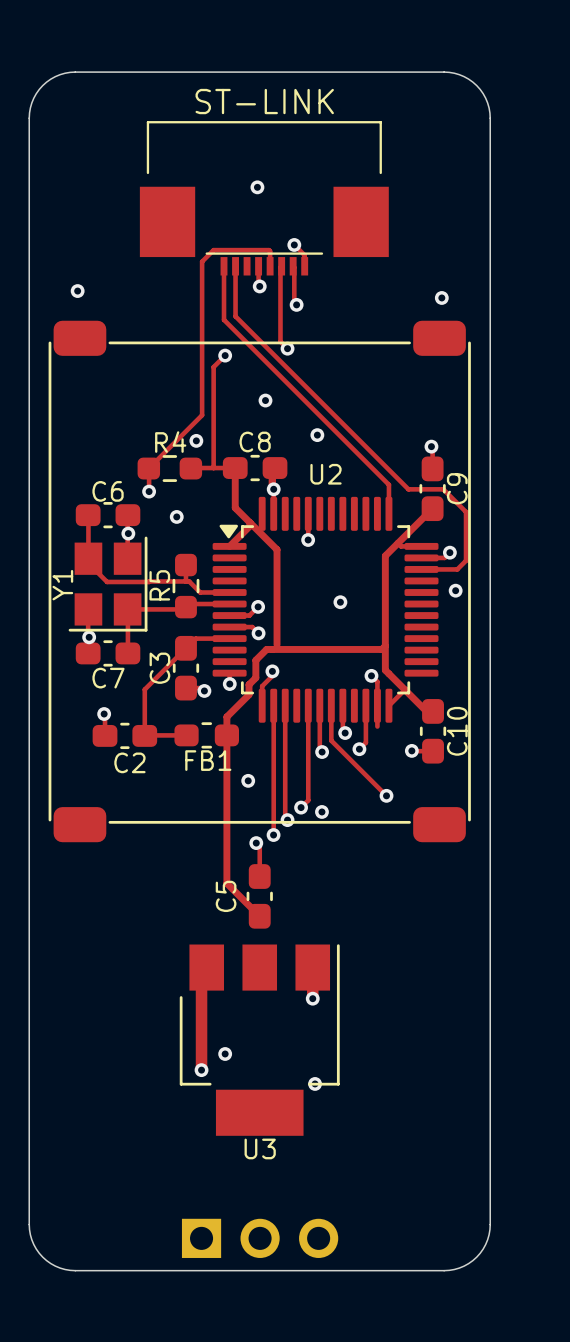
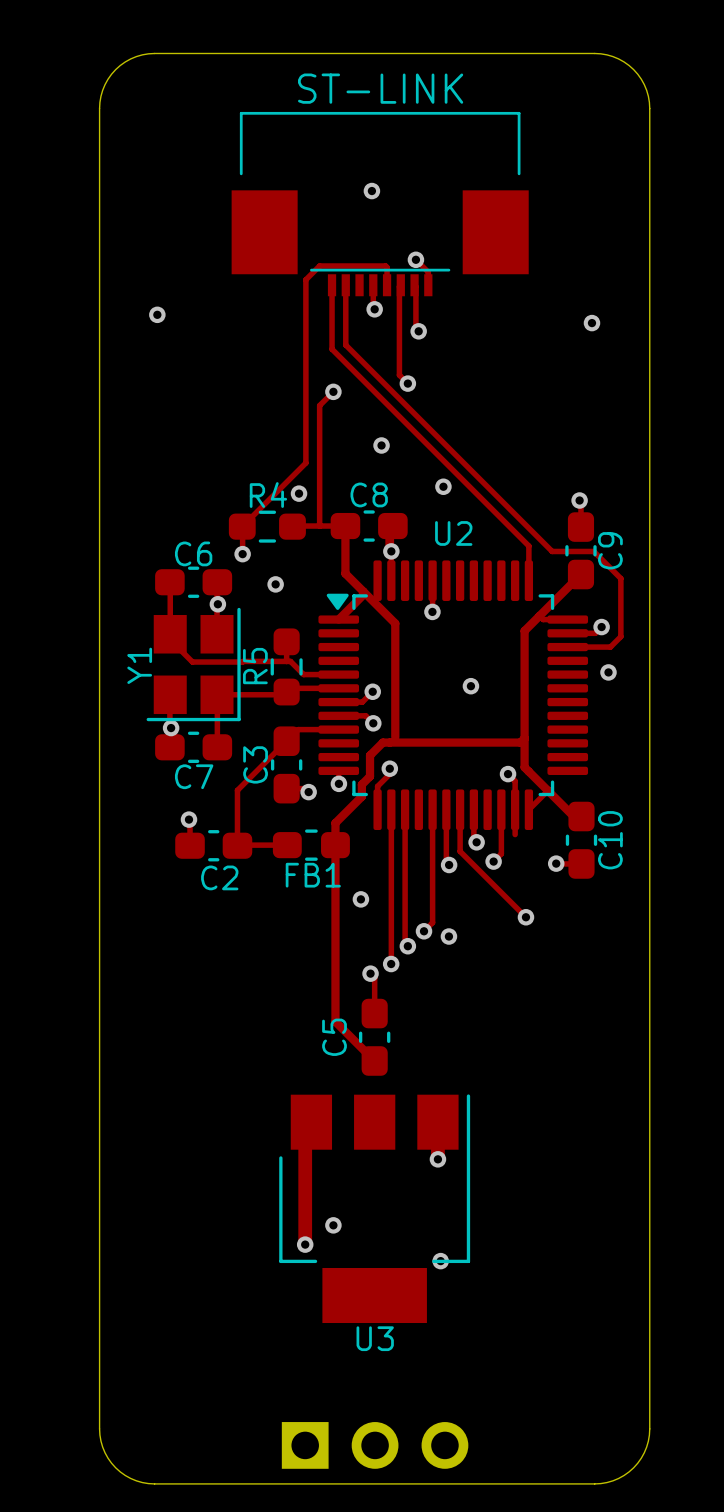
part: (259, 581) -> none

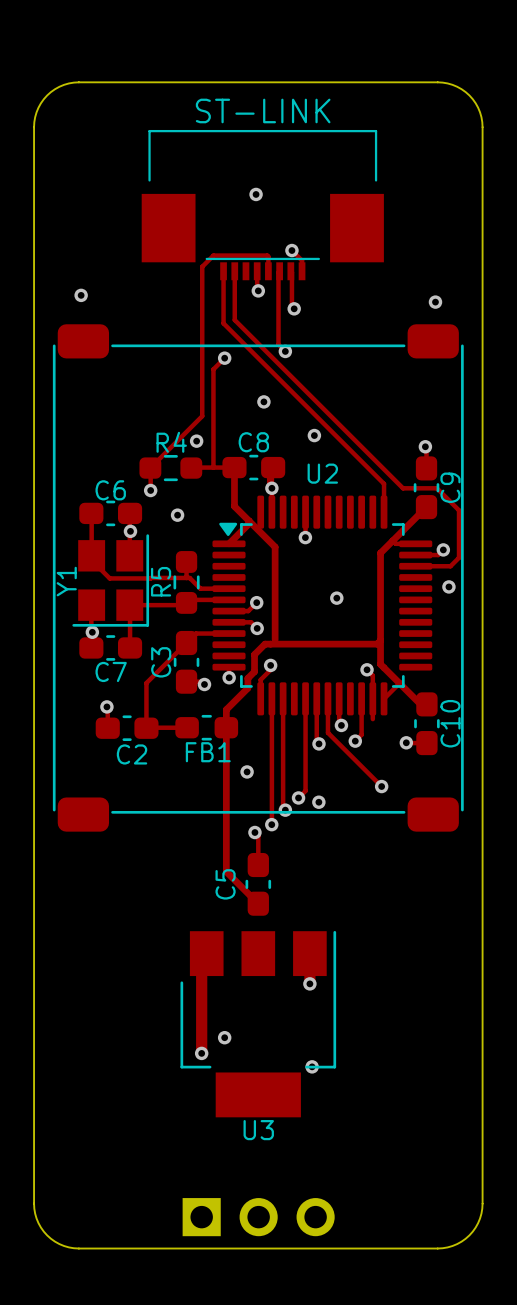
part: none -> (258, 577)

